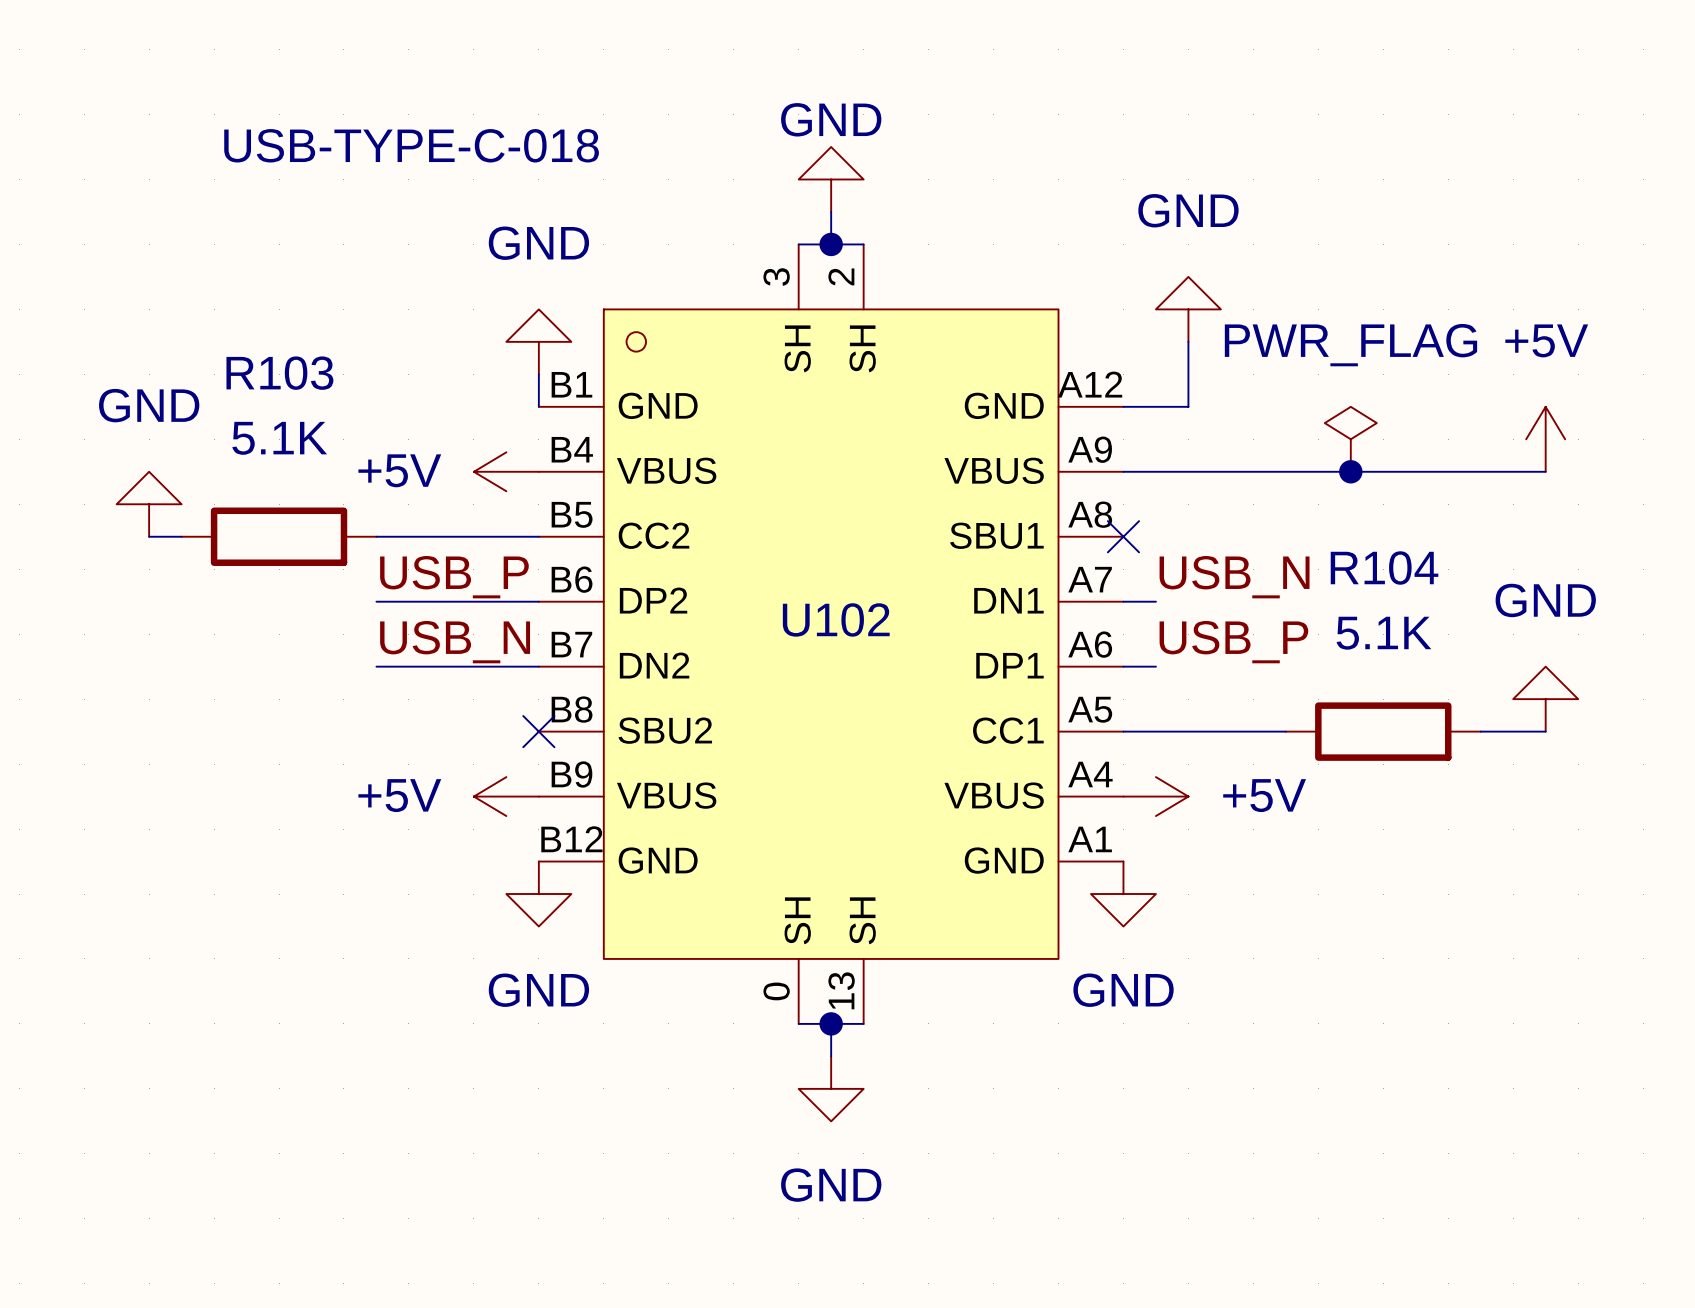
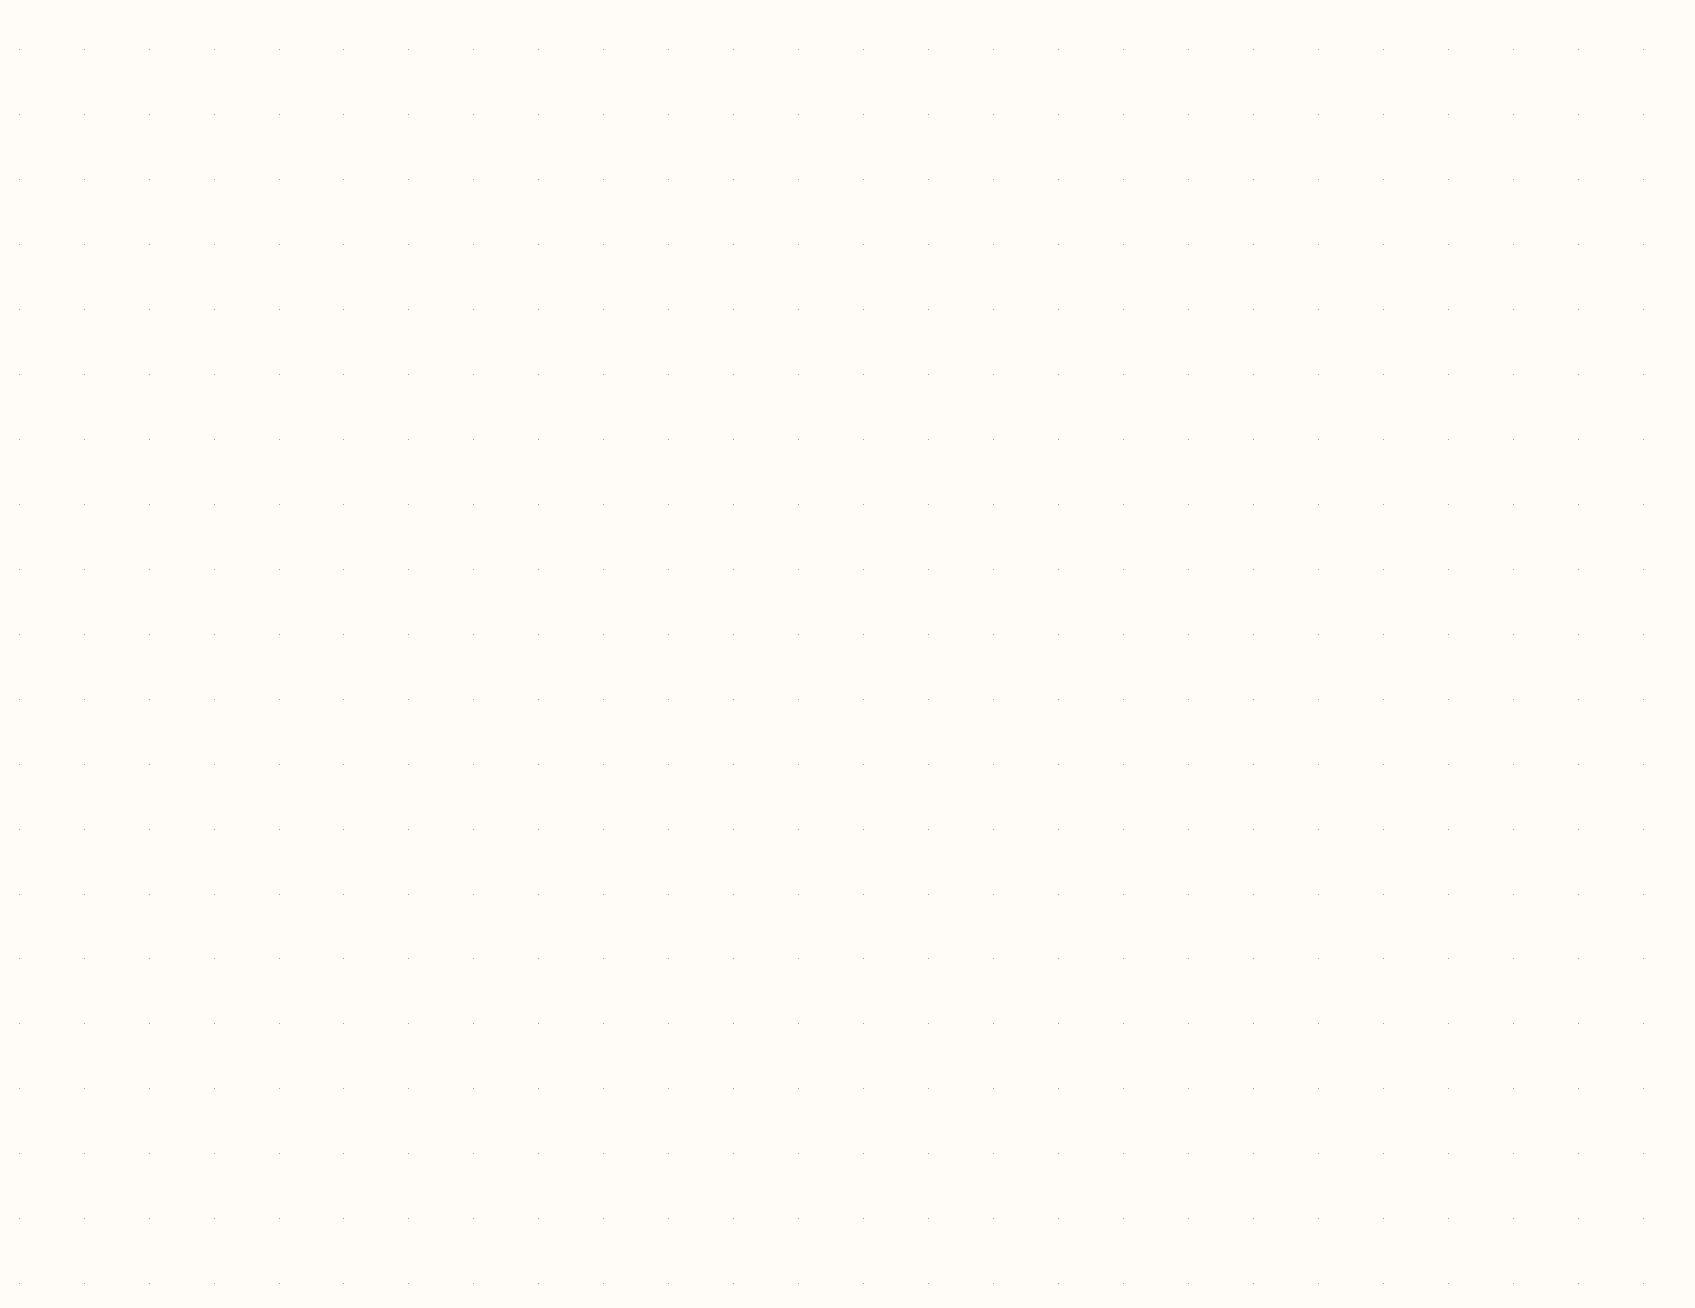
power symbol: GND (831, 179) -> none
wire: (831, 211) (831, 244) -> none
wire: (798, 244) (863, 244) -> none
junction: (831, 244) -> none
power symbol: GND (1188, 309) -> none
power symbol: GND (538, 341) -> none
wire: (1188, 341) (1188, 406) (1123, 406) -> none
wire: (538, 374) (538, 406) -> none
power symbol: PWR_FLAG (1350, 439) -> none
power symbol: +5V (1545, 439) -> none
power symbol: +5V (506, 471) -> none
wire: (1123, 471) (1545, 471) -> none
junction: (1350, 471) -> none
power symbol: GND (149, 504) -> none
wire: (149, 536) (181, 536) -> none
R103: 5.1K (279, 536) -> none
wire: (376, 536) (538, 536) -> none
no-connect mark: (1123, 536) -> none
label: USB_P (454, 577) -> none
label: USB_N (1234, 577) -> none
wire: (376, 601) (538, 601) -> none
wire: (1123, 601) (1155, 601) -> none
U102: USB-TYPE-C-018 (831, 634) -> none
label: USB_N (455, 642) -> none
label: USB_P (1233, 642) -> none
wire: (376, 666) (538, 666) -> none
wire: (1123, 666) (1155, 666) -> none
power symbol: GND (1545, 699) -> none
no-connect mark: (538, 731) -> none
wire: (1123, 731) (1285, 731) -> none
R104: 5.1K (1383, 731) -> none
wire: (1480, 731) (1545, 731) -> none
power symbol: +5V (506, 796) -> none
power symbol: +5V (1155, 796) -> none
power symbol: GND (538, 894) -> none
power symbol: GND (1123, 894) -> none
wire: (798, 1023) (863, 1023) -> none
wire: (831, 1023) (831, 1056) -> none
junction: (831, 1023) -> none
power symbol: GND (831, 1088) -> none

